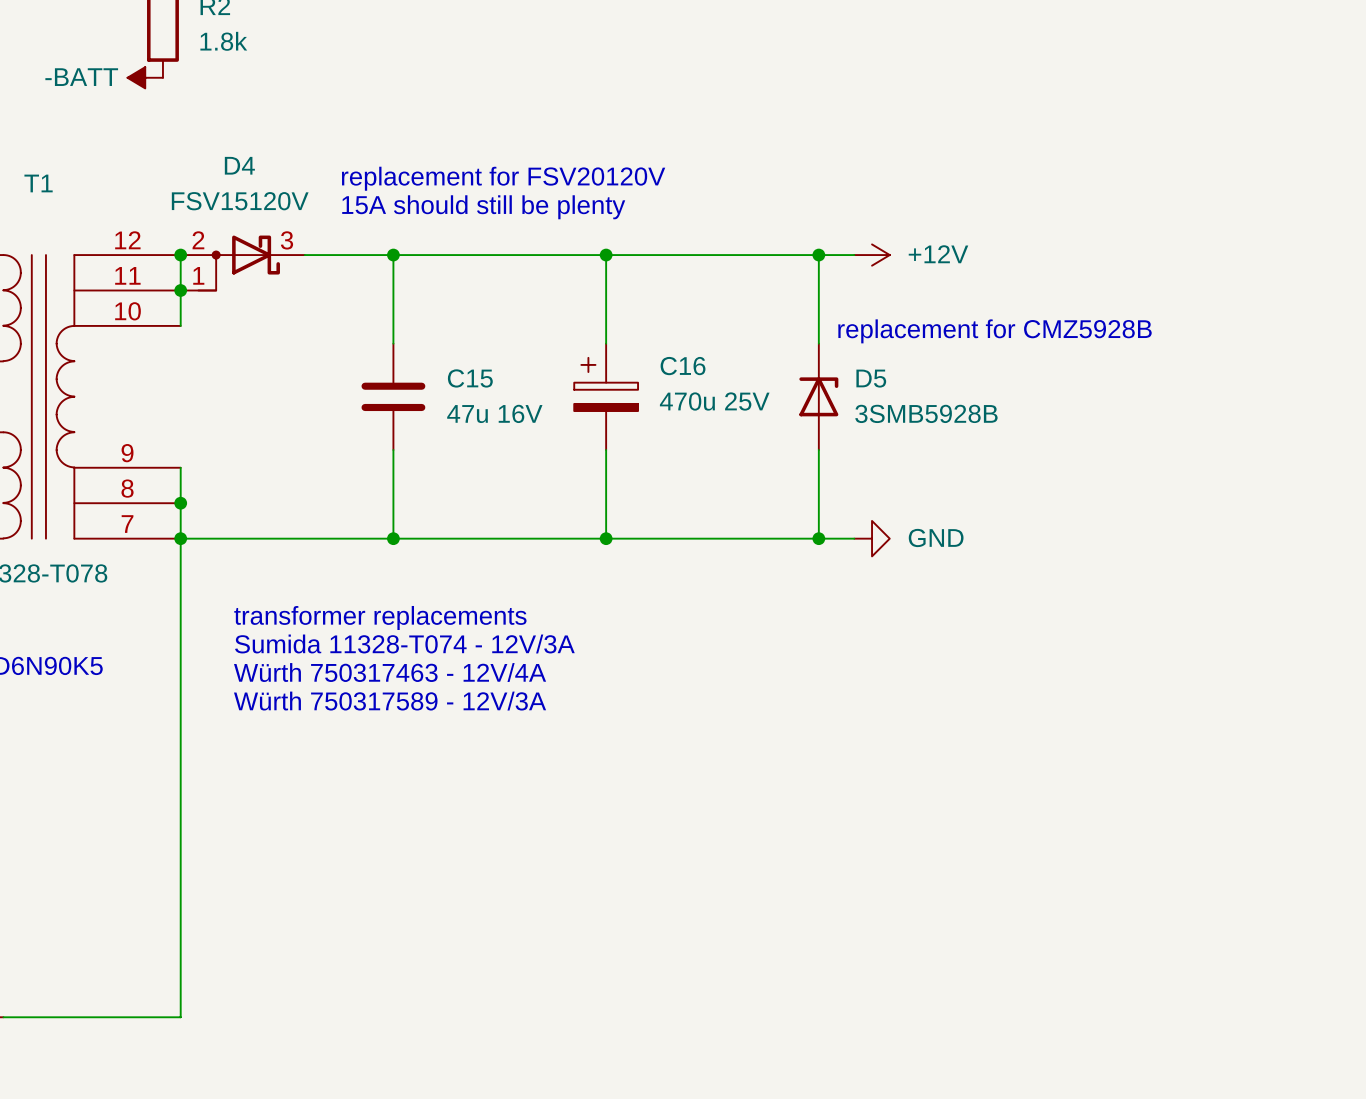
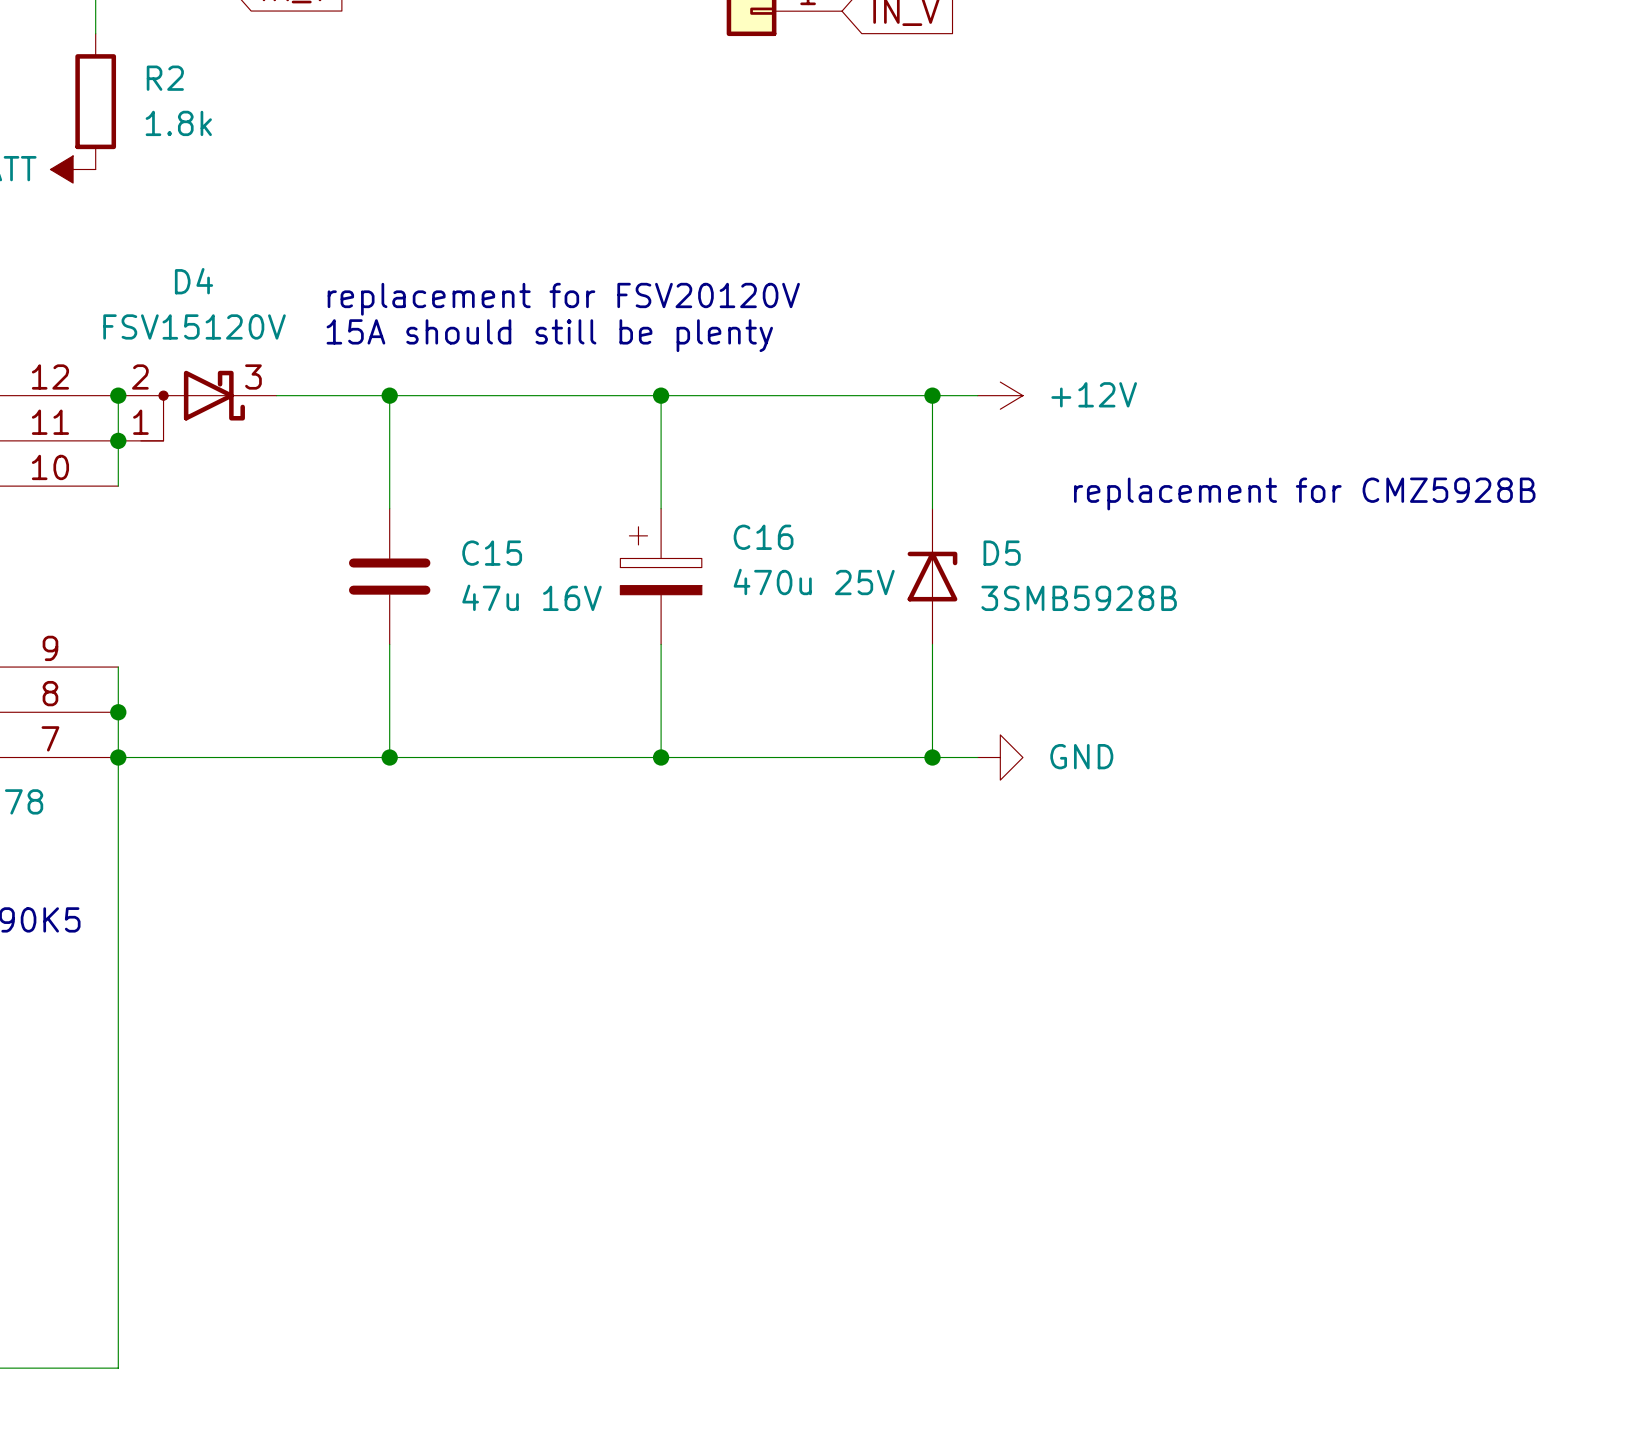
text position: replacement for CMZ5928B (994, 331) -> replacement for CMZ5928B (1304, 493)
text: transformer replacements (380, 617) -> none
text: Sumida 11328-T074 - 12V/3A (404, 643) -> none
text: Würth 750317463 - 12V/4A (390, 672) -> none
text: Würth 750317589 - 12V/3A (390, 701) -> none

